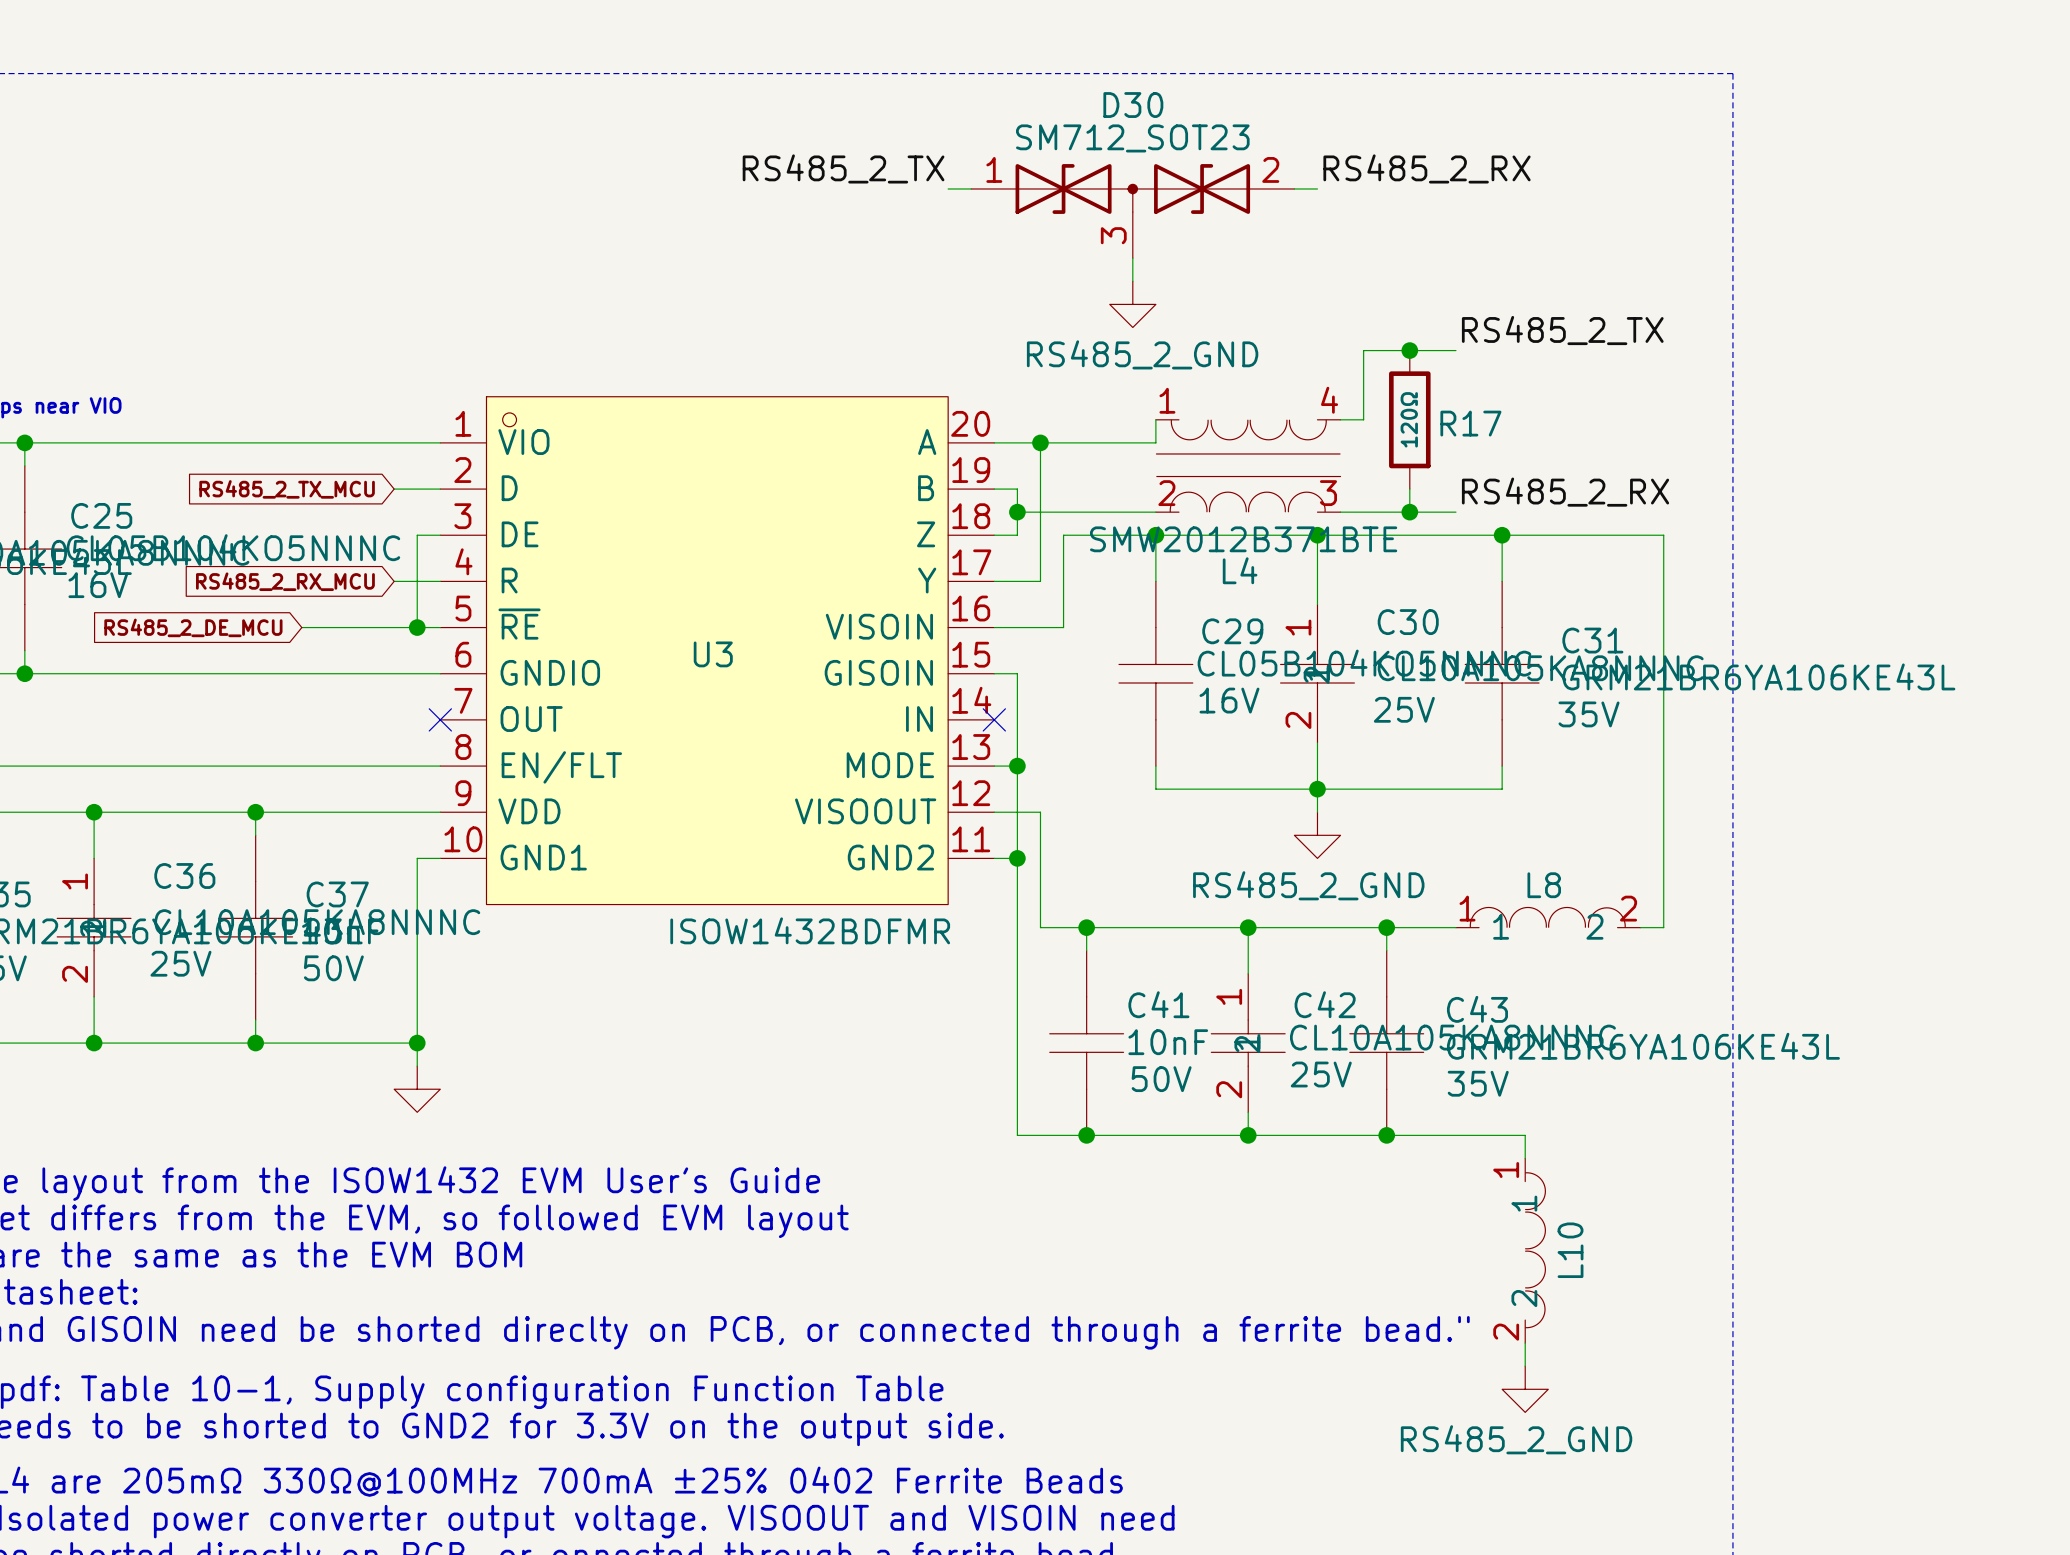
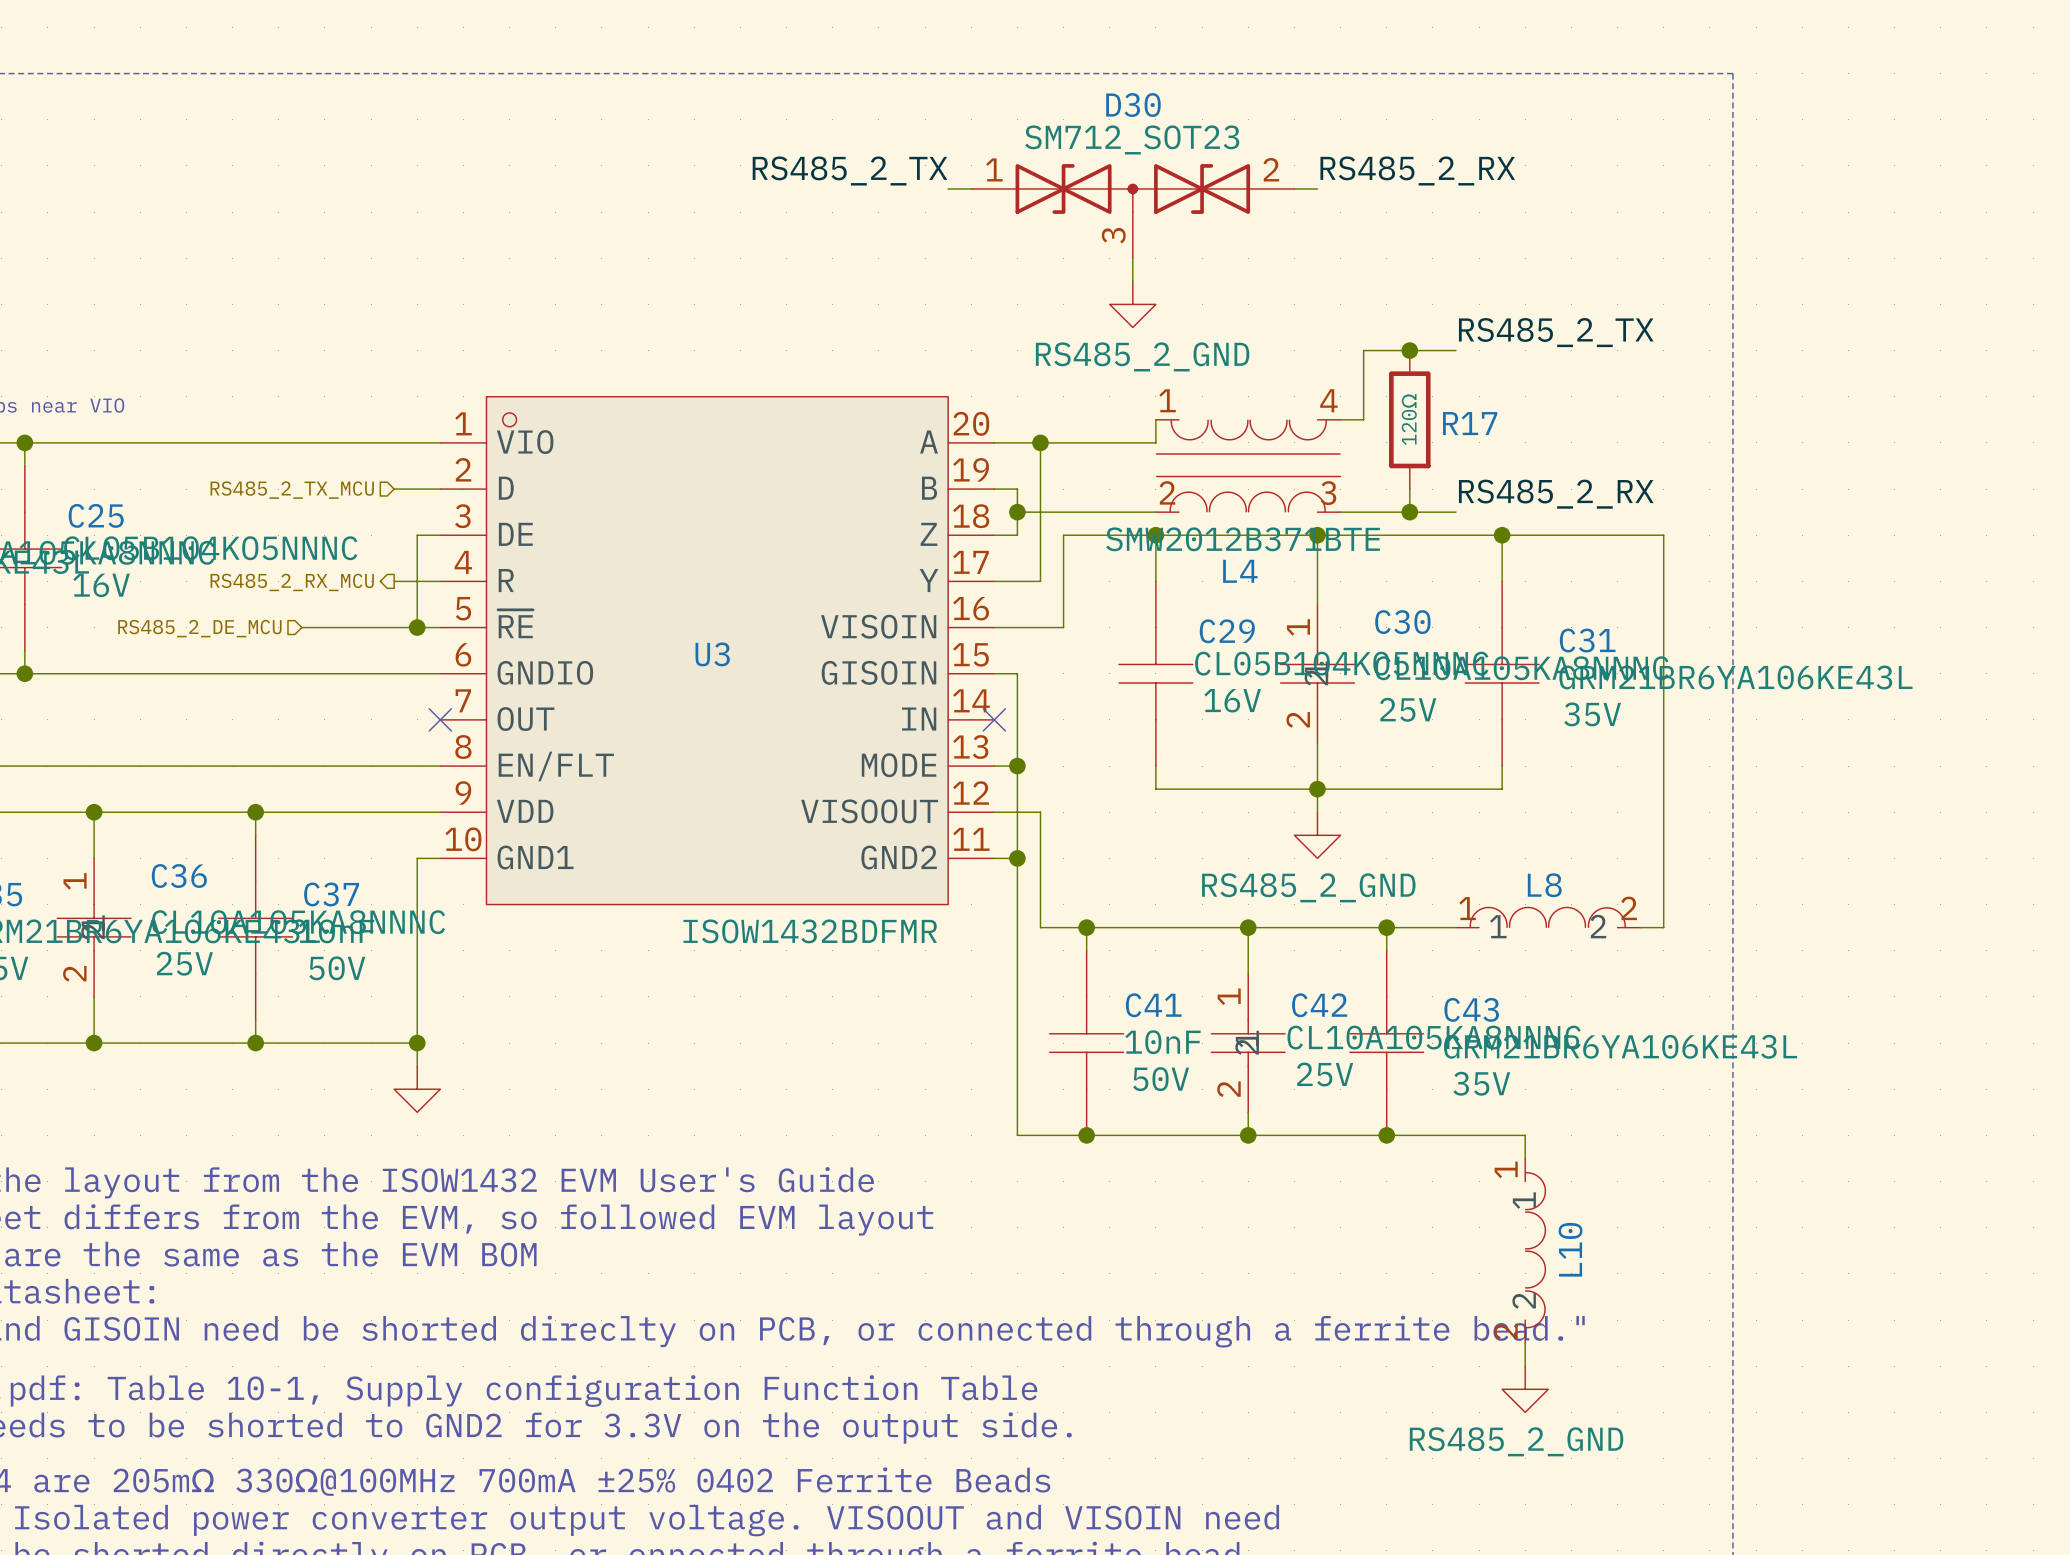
hierarchical label: none -> RS485_2_TX_MCU (292, 490)
global label: RS485_2_TX_MCU (287, 489) -> none
hierarchical label: none -> RS485_2_RX_MCU (292, 582)
global label: RS485_2_RX_MCU (285, 581) -> none
hierarchical label: none -> RS485_2_DE_MCU (199, 628)
global label: RS485_2_DE_MCU (193, 627) -> none

